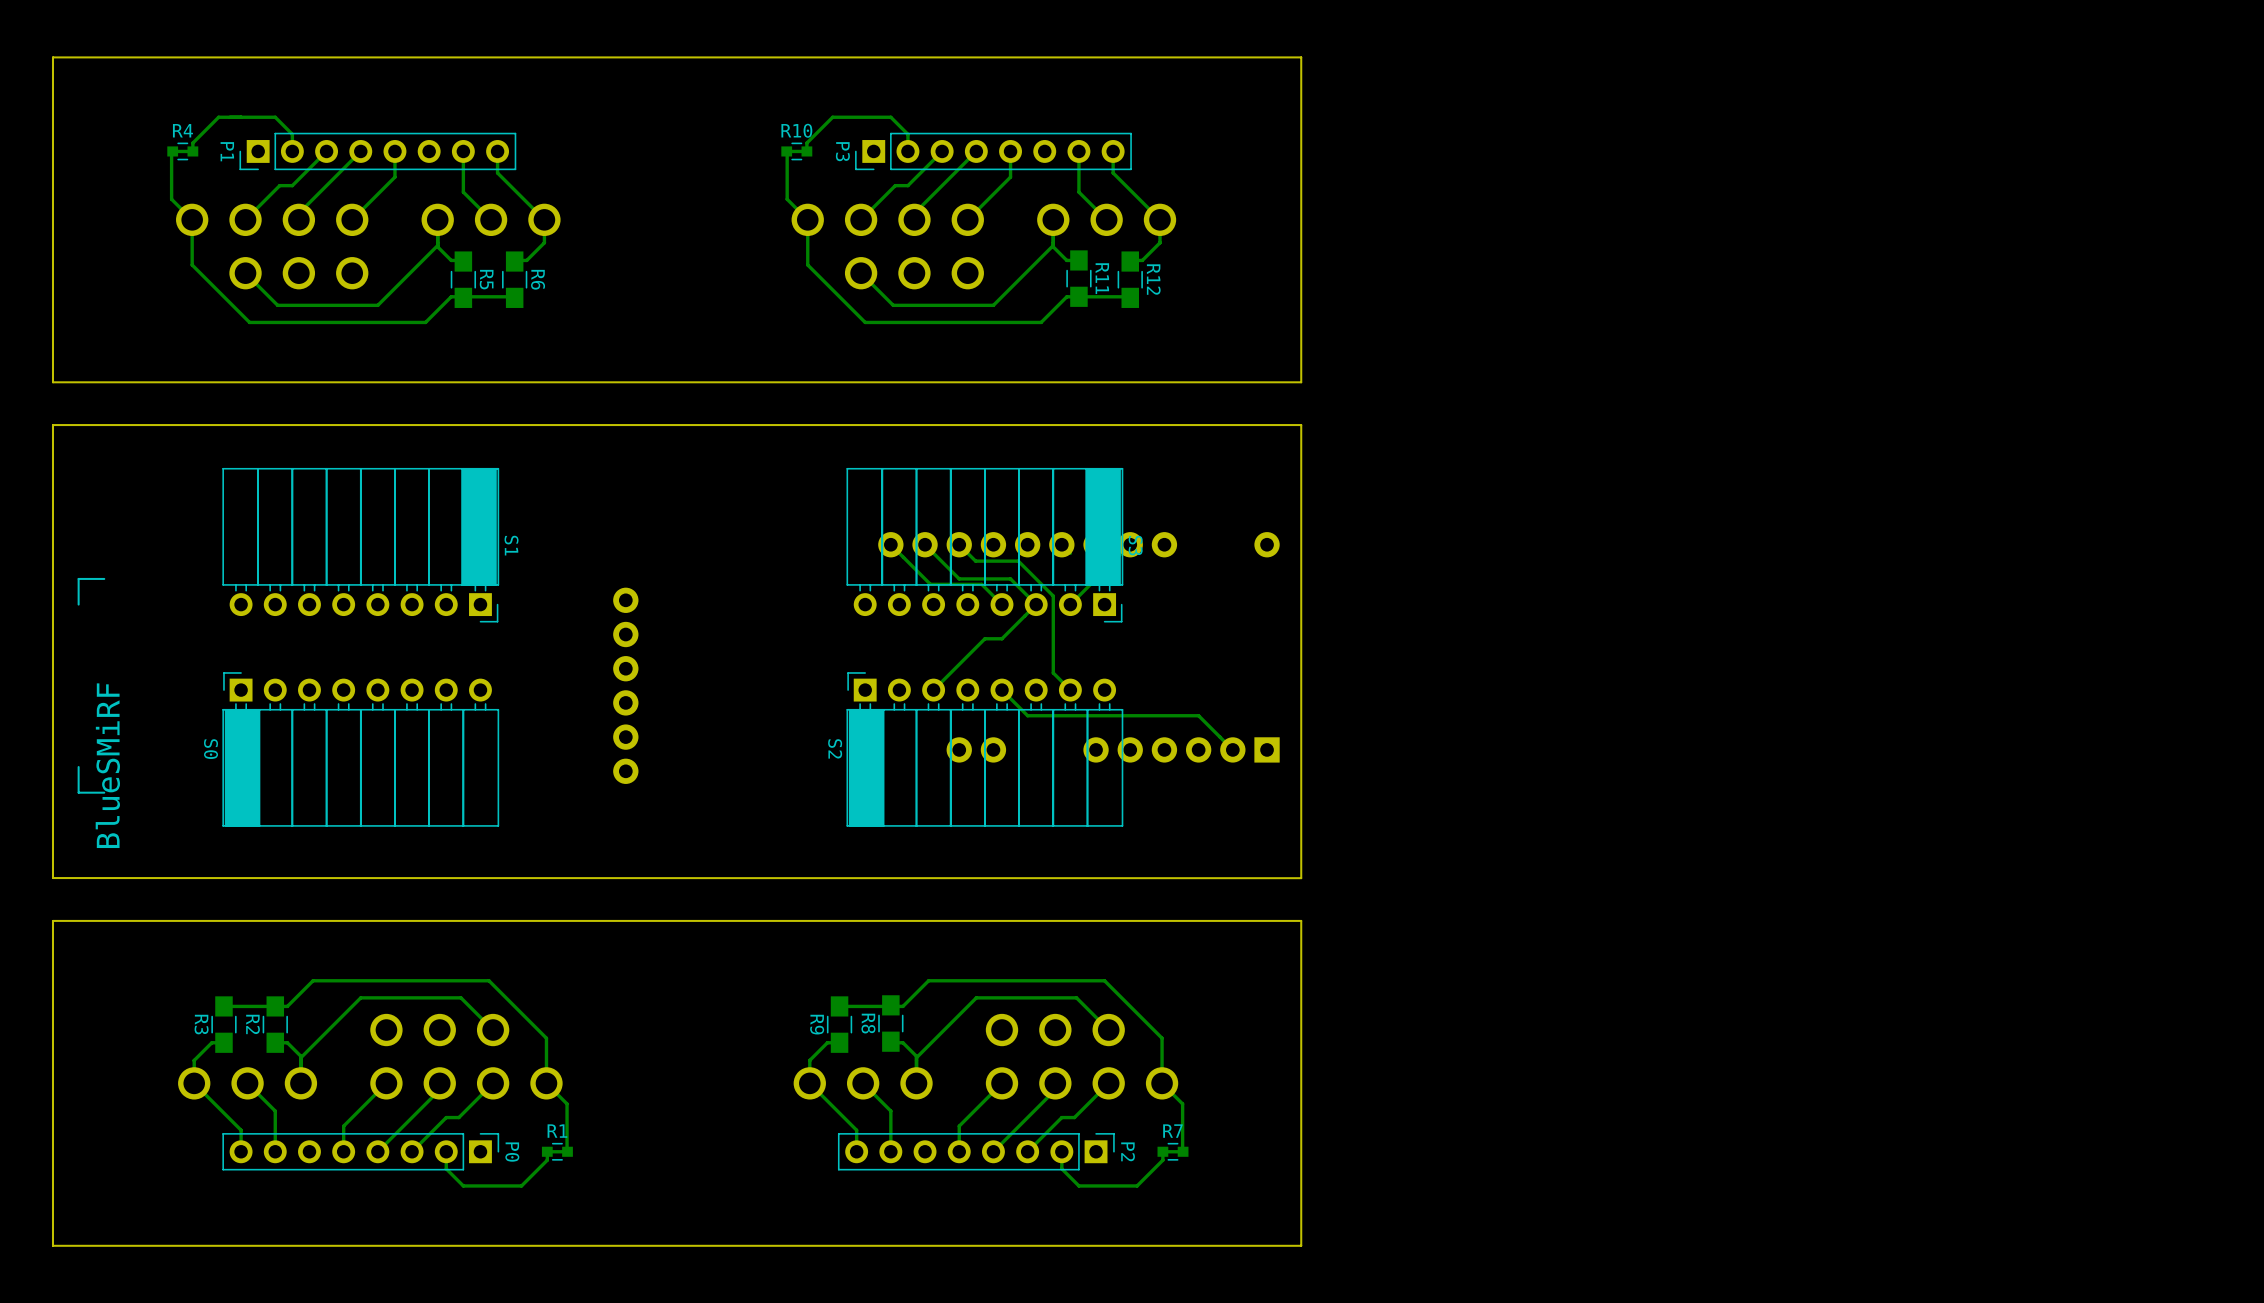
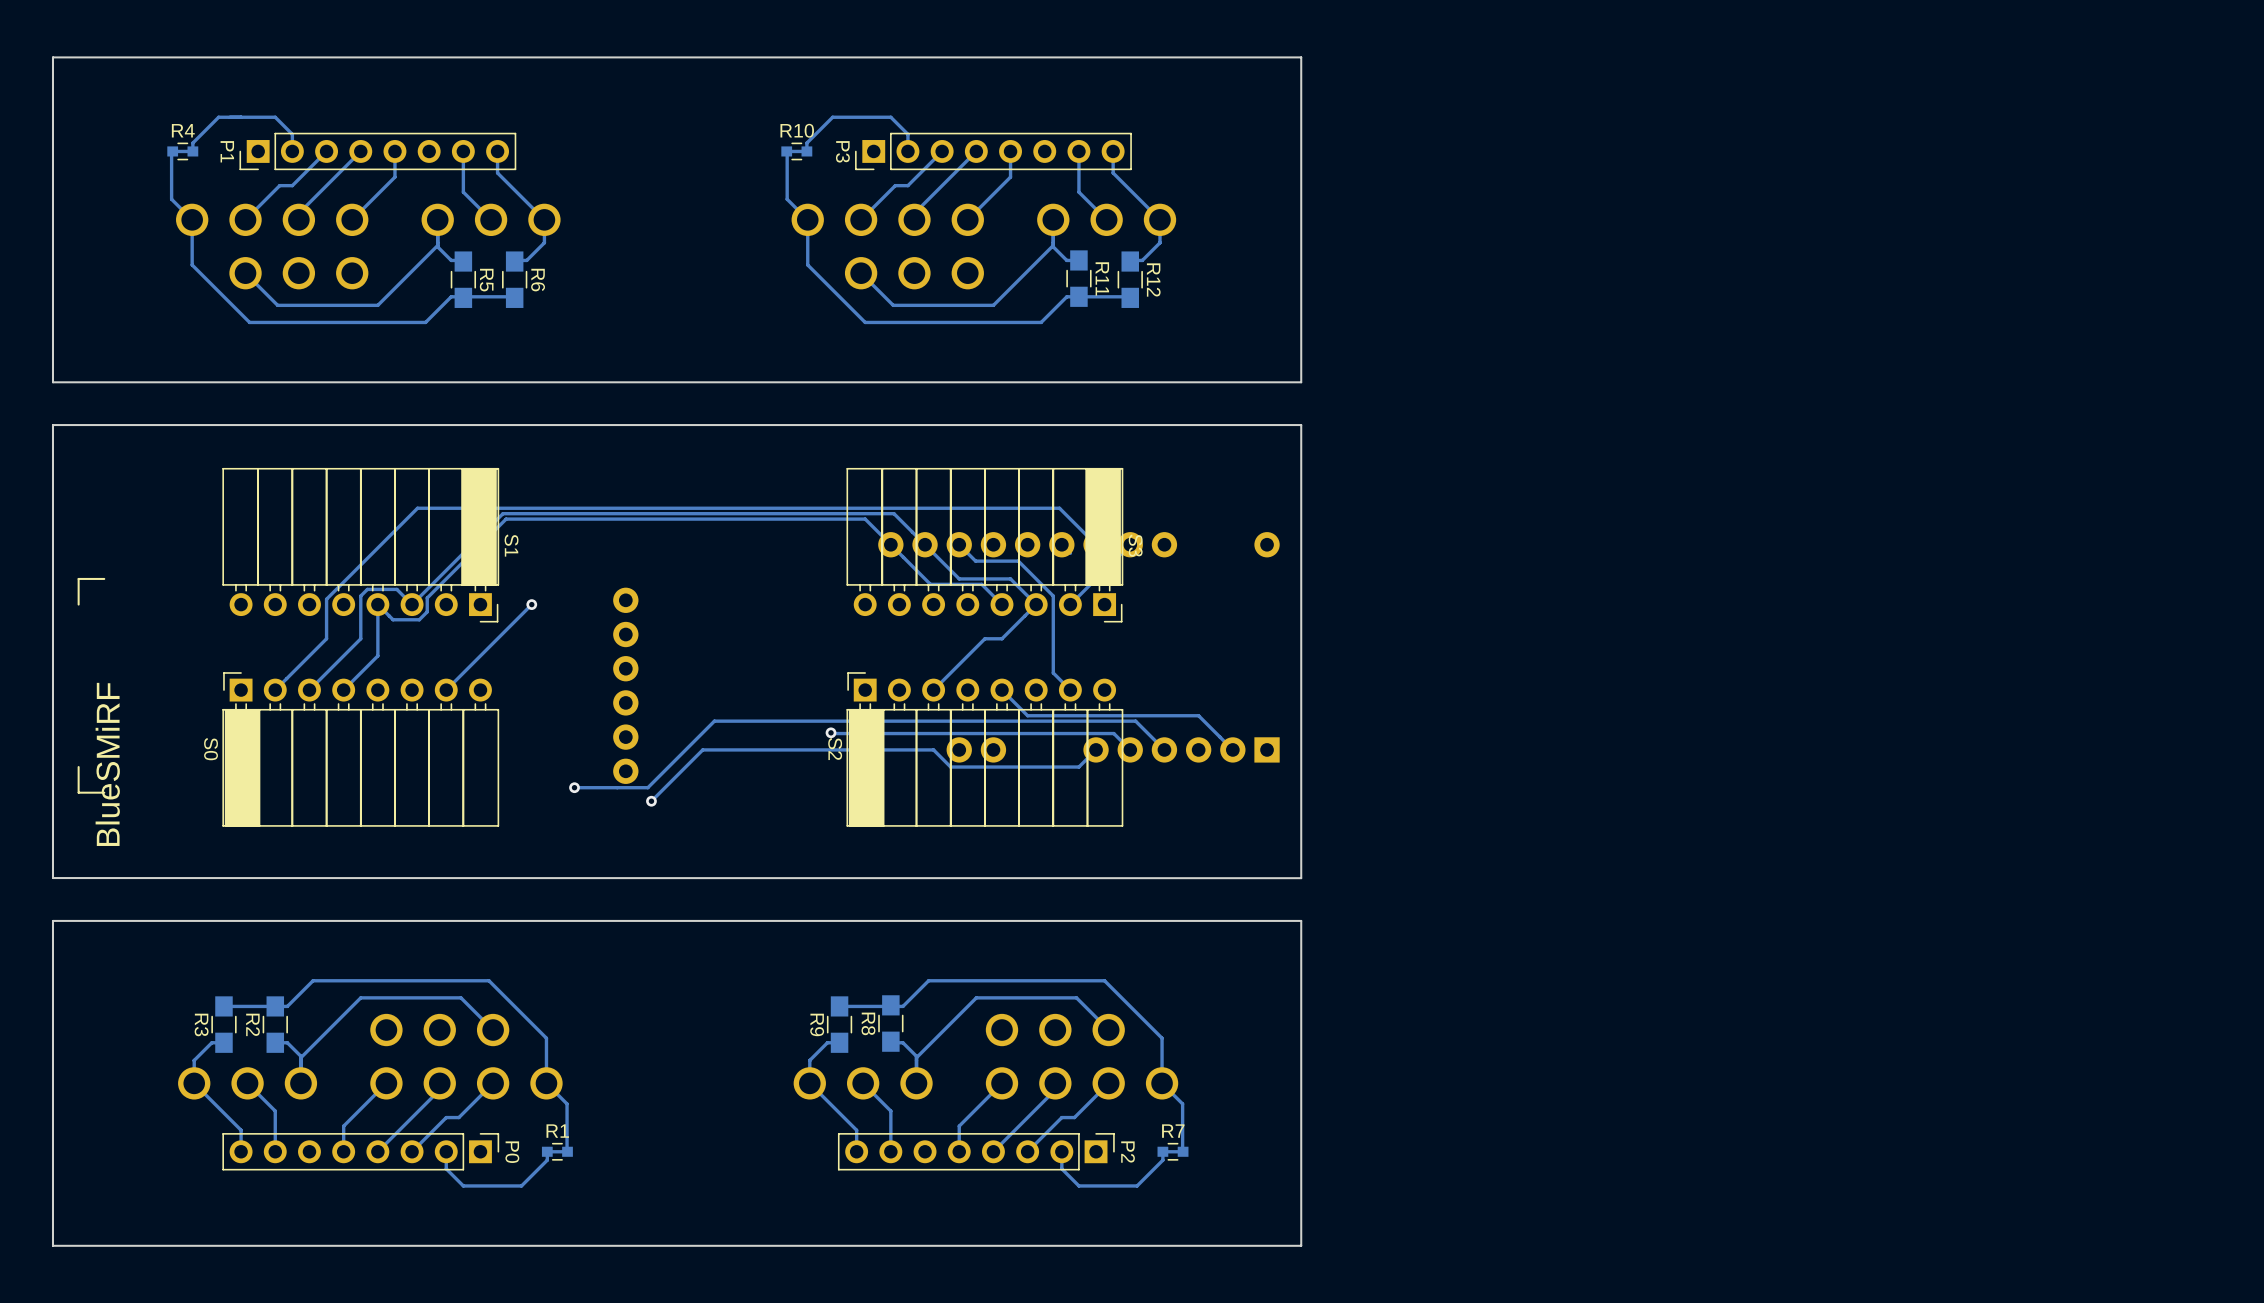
track: none -> (890, 544) (865, 519) (506, 519) (427, 597) (427, 611) (419, 619) (393, 619) (377, 604) (377, 655) (343, 690)
track: none -> (925, 544) (893, 513) (502, 513) (412, 604) (396, 589) (367, 589) (360, 596) (360, 638) (309, 690)
track: none -> (1096, 544) (1059, 508) (417, 508) (326, 599) (326, 638) (275, 690)
track: none -> (531, 604) (446, 690)
via: none -> (531, 604)
track: none -> (831, 732) (1113, 733) (1130, 749)
via: none -> (831, 732)
track: none -> (1096, 749) (1078, 767) (950, 767) (933, 749) (702, 749) (651, 801)
track: none -> (1164, 749) (1135, 721) (714, 721) (647, 787) (574, 787)
via: none -> (574, 787)
via: none -> (651, 801)

